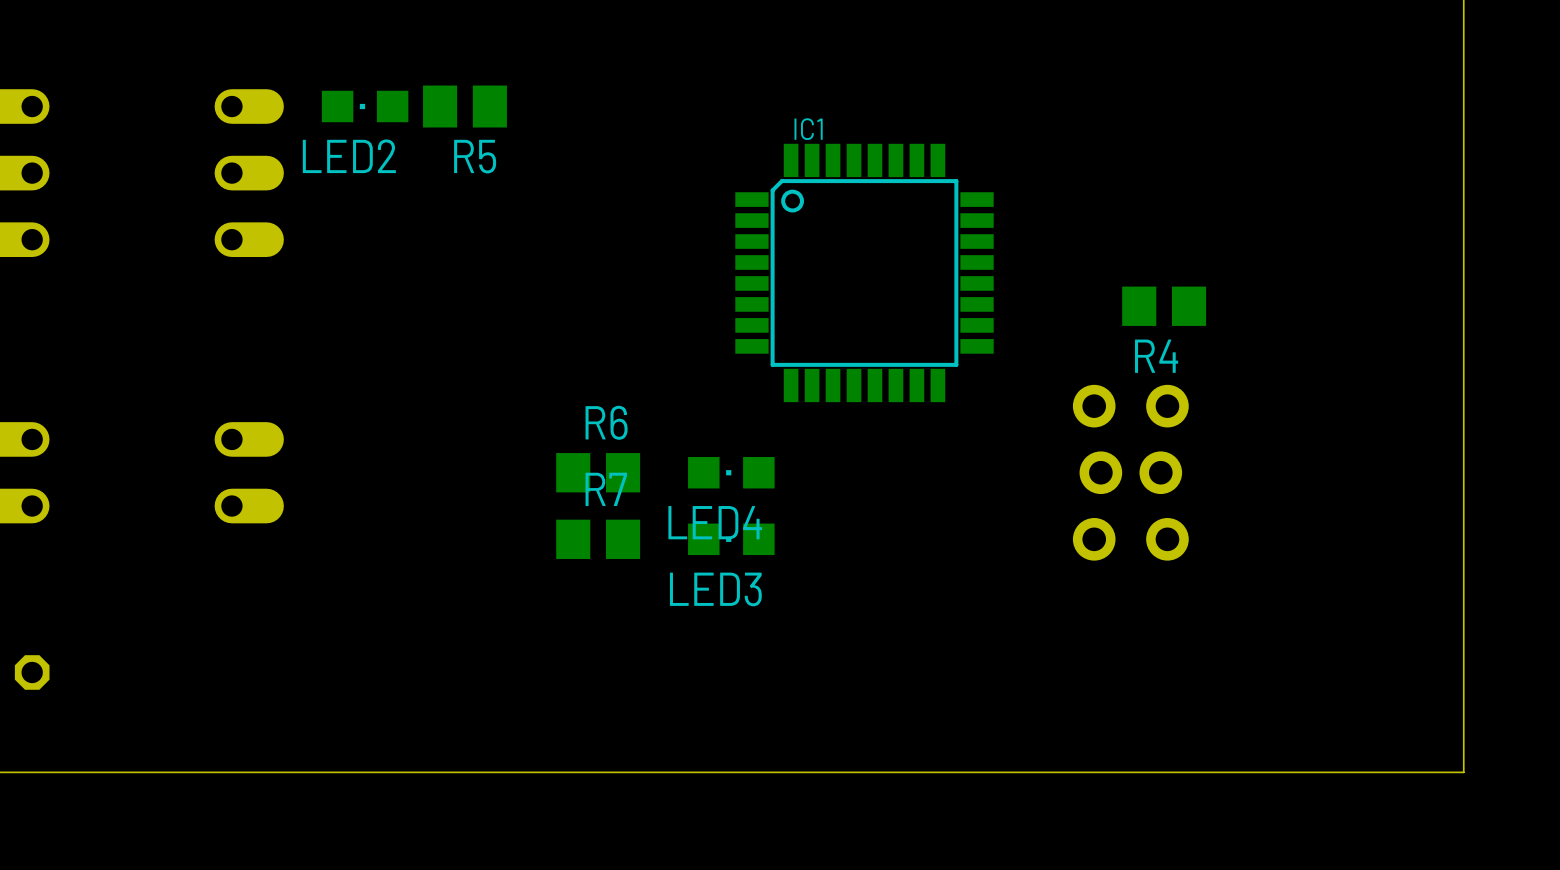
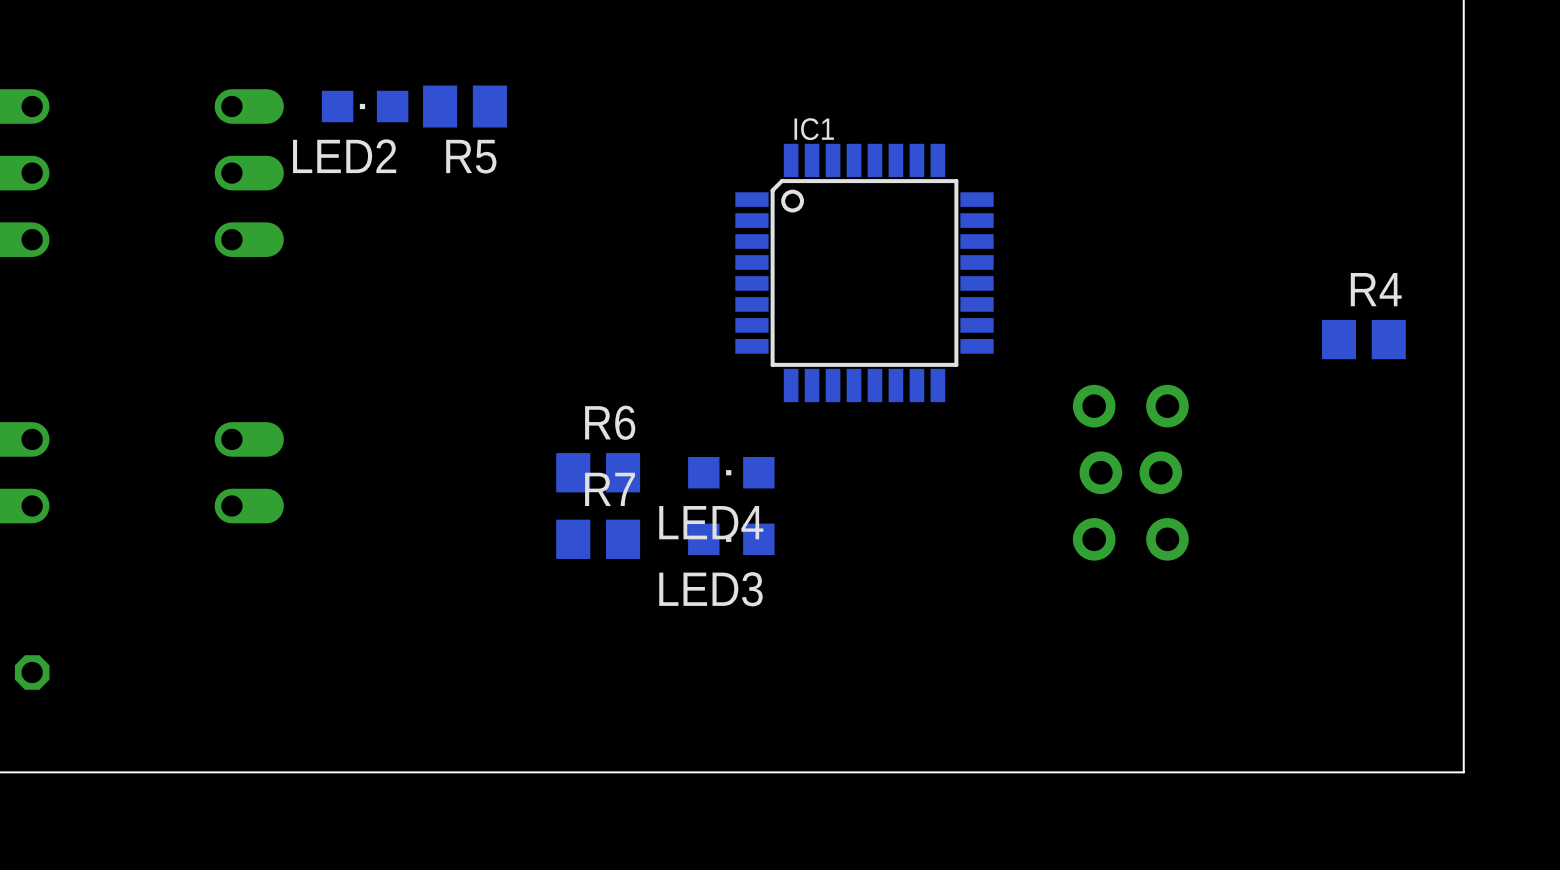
R4 position: (1164, 306) -> (1363, 339)
R4 name position: R4 (1156, 356) -> R4 (1376, 289)

